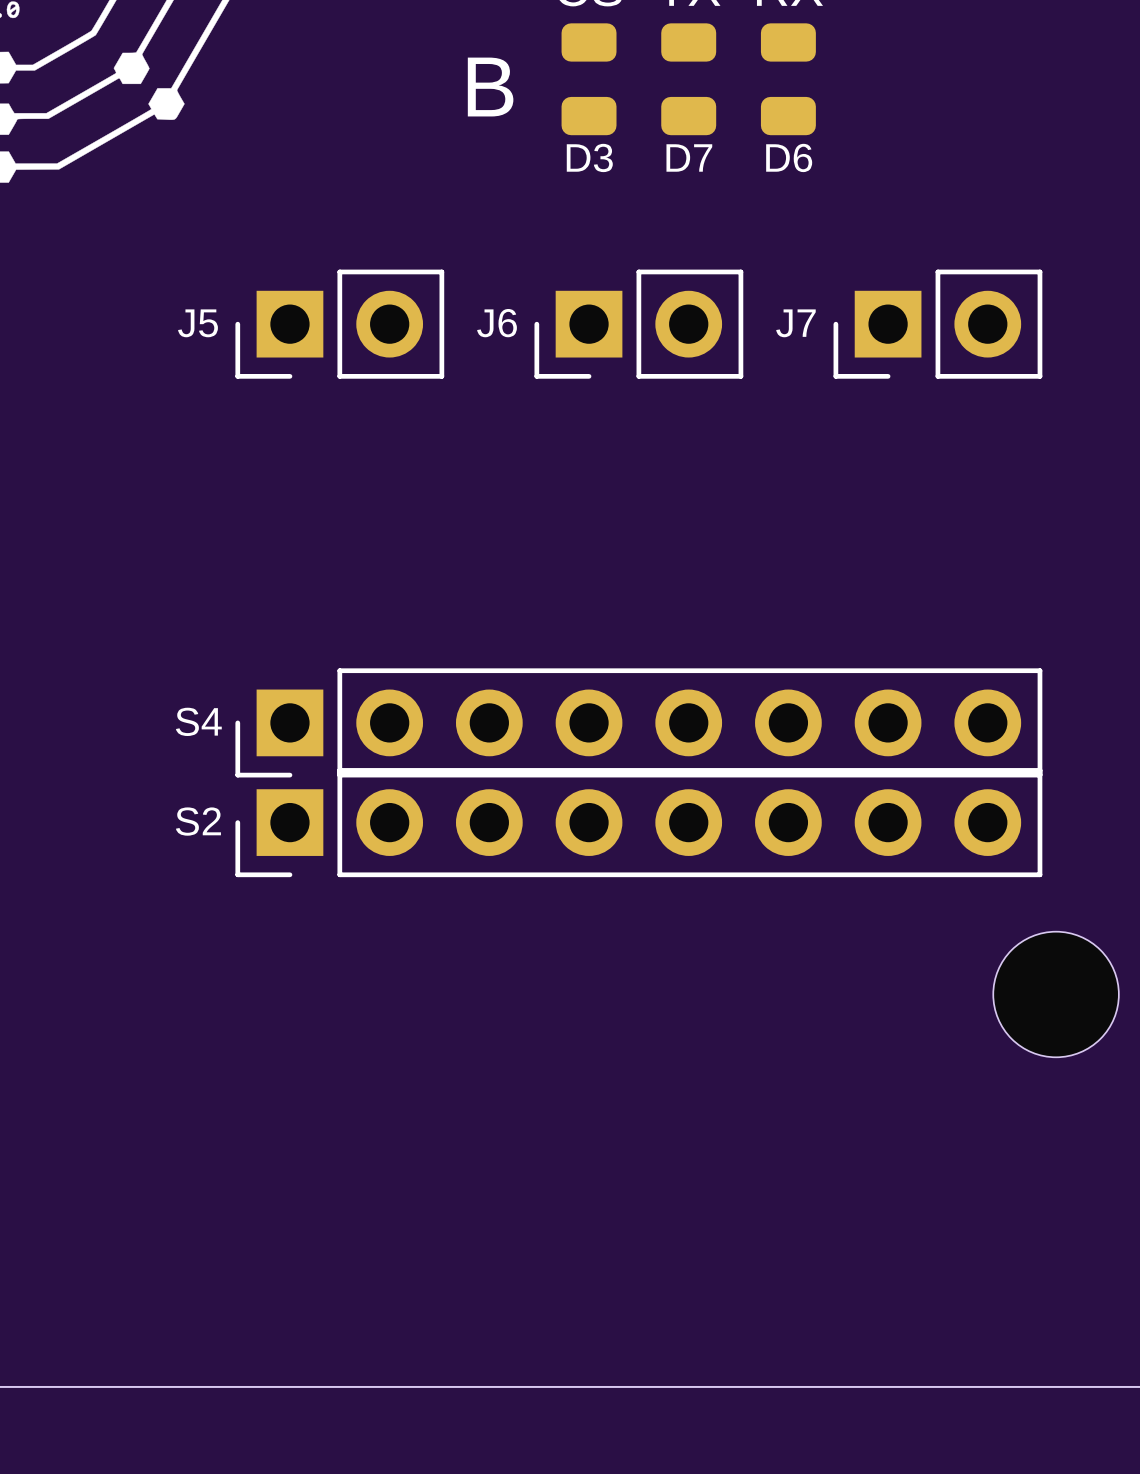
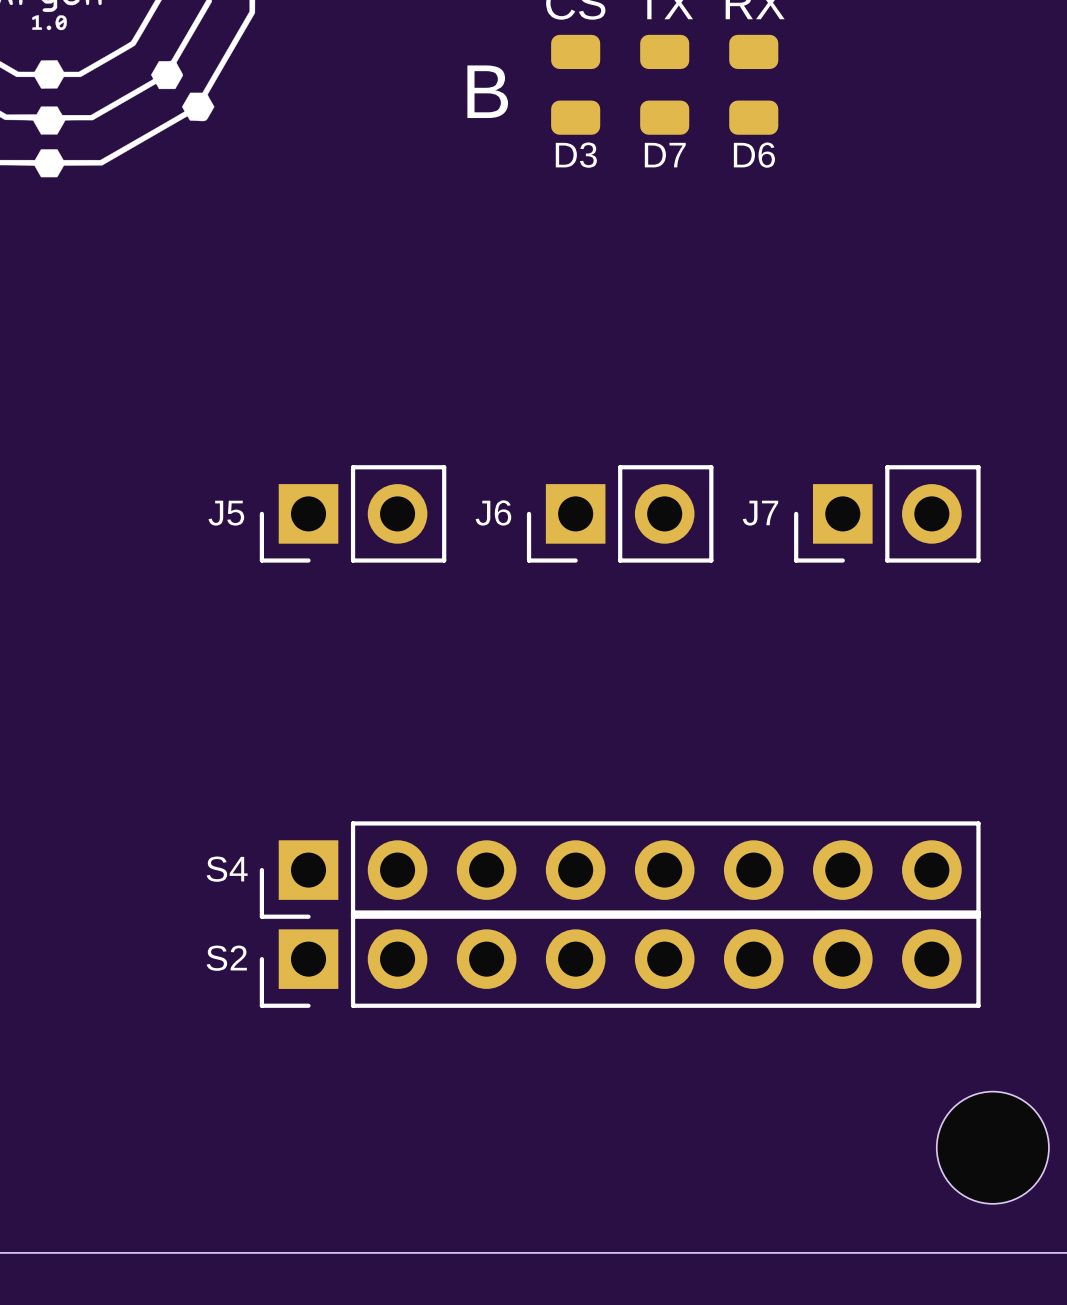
J5 position: (339, 324) -> (353, 513)
J6 position: (638, 324) -> (620, 513)
J7 position: (937, 324) -> (887, 513)
S4 position: (638, 722) -> (620, 870)
S2 position: (638, 822) -> (620, 959)
part position: (1056, 994) -> (992, 1147)

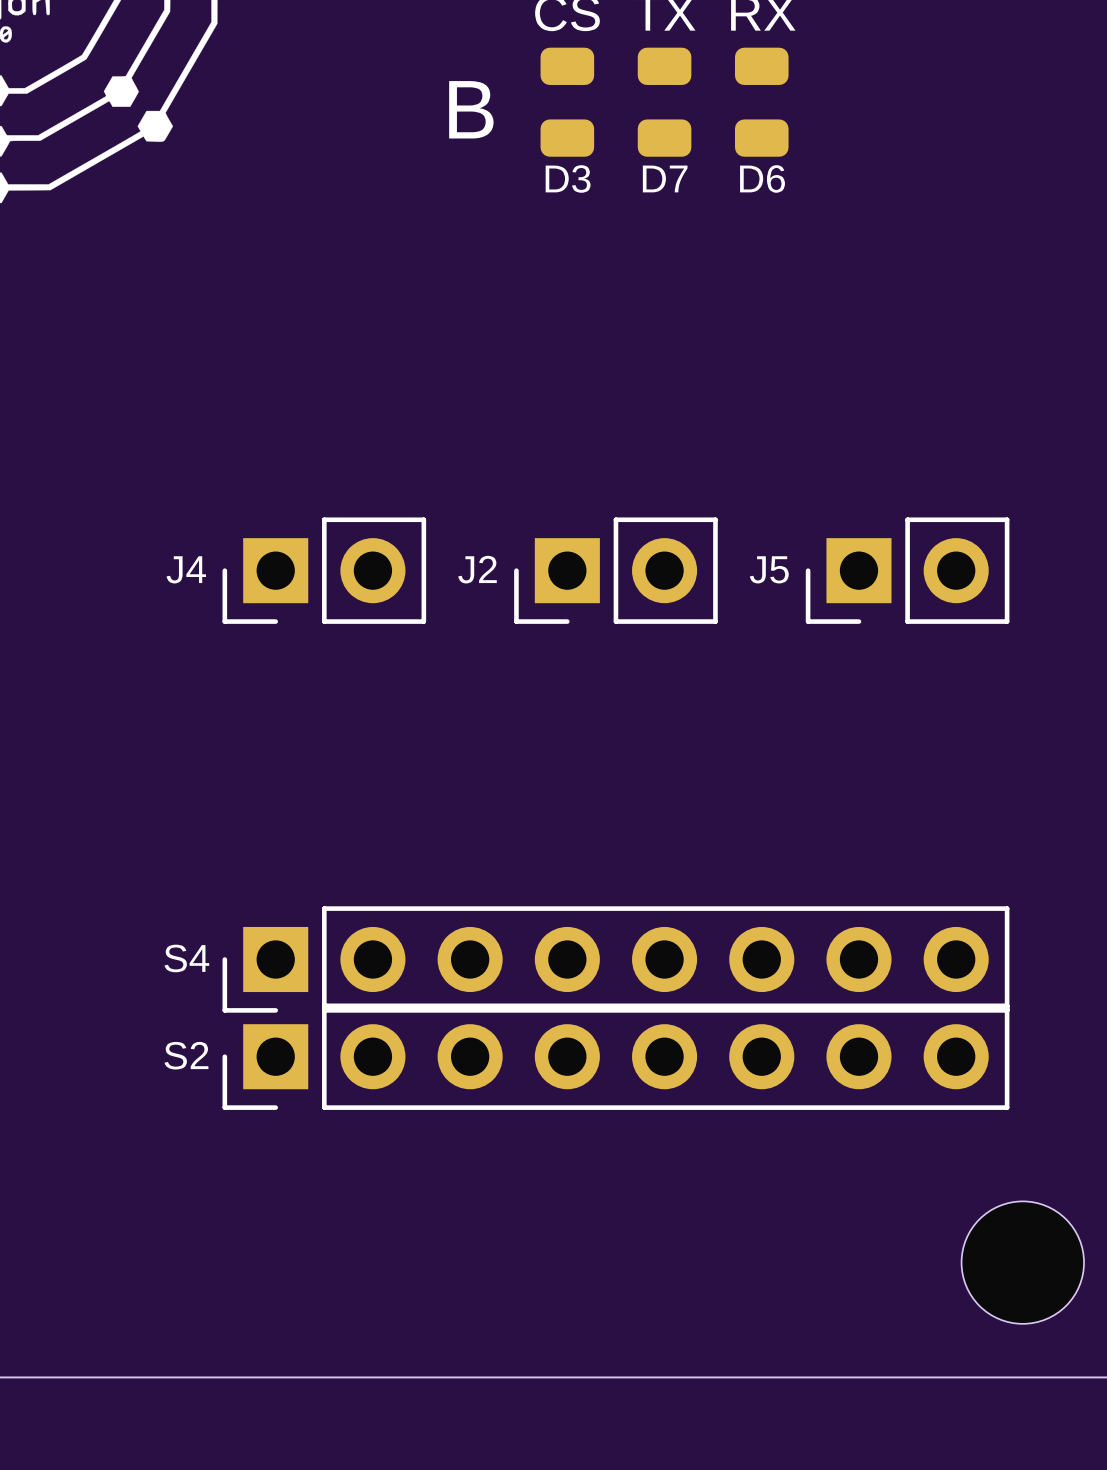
J6 name: J6 (493, 512) -> J2 (477, 569)
J5 name: J5 (226, 513) -> J4 (186, 569)
J7 name: J7 (760, 513) -> J5 (769, 569)

